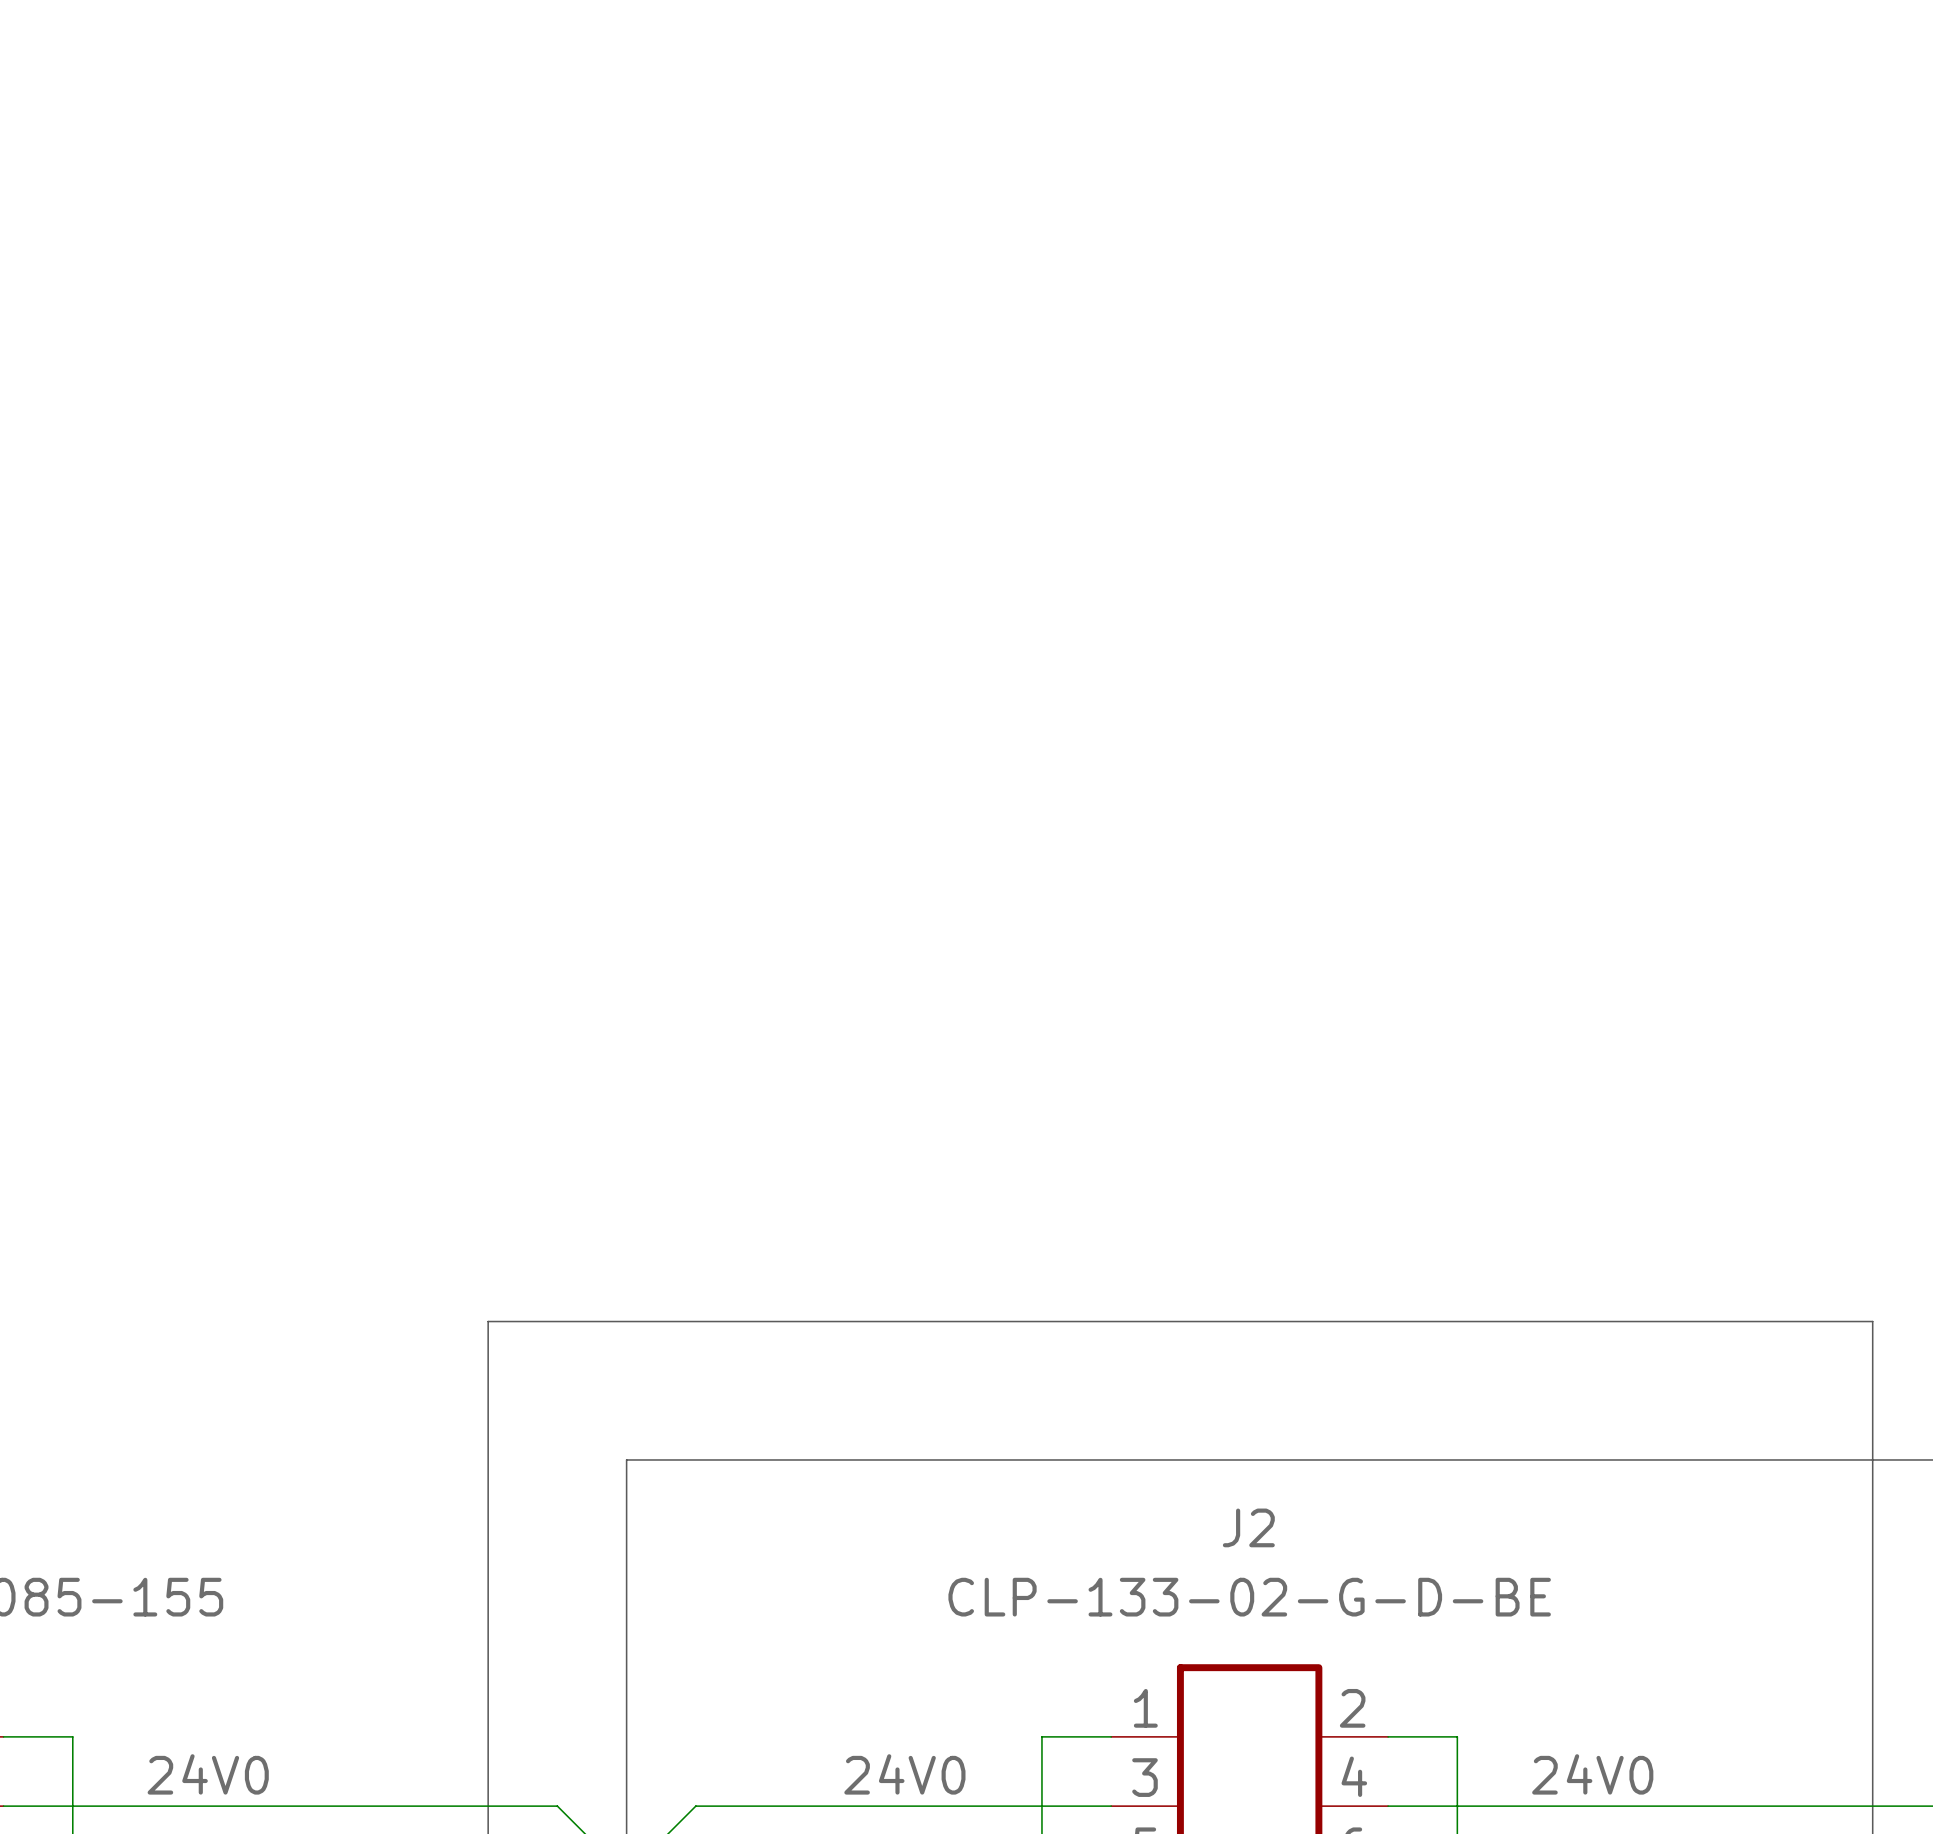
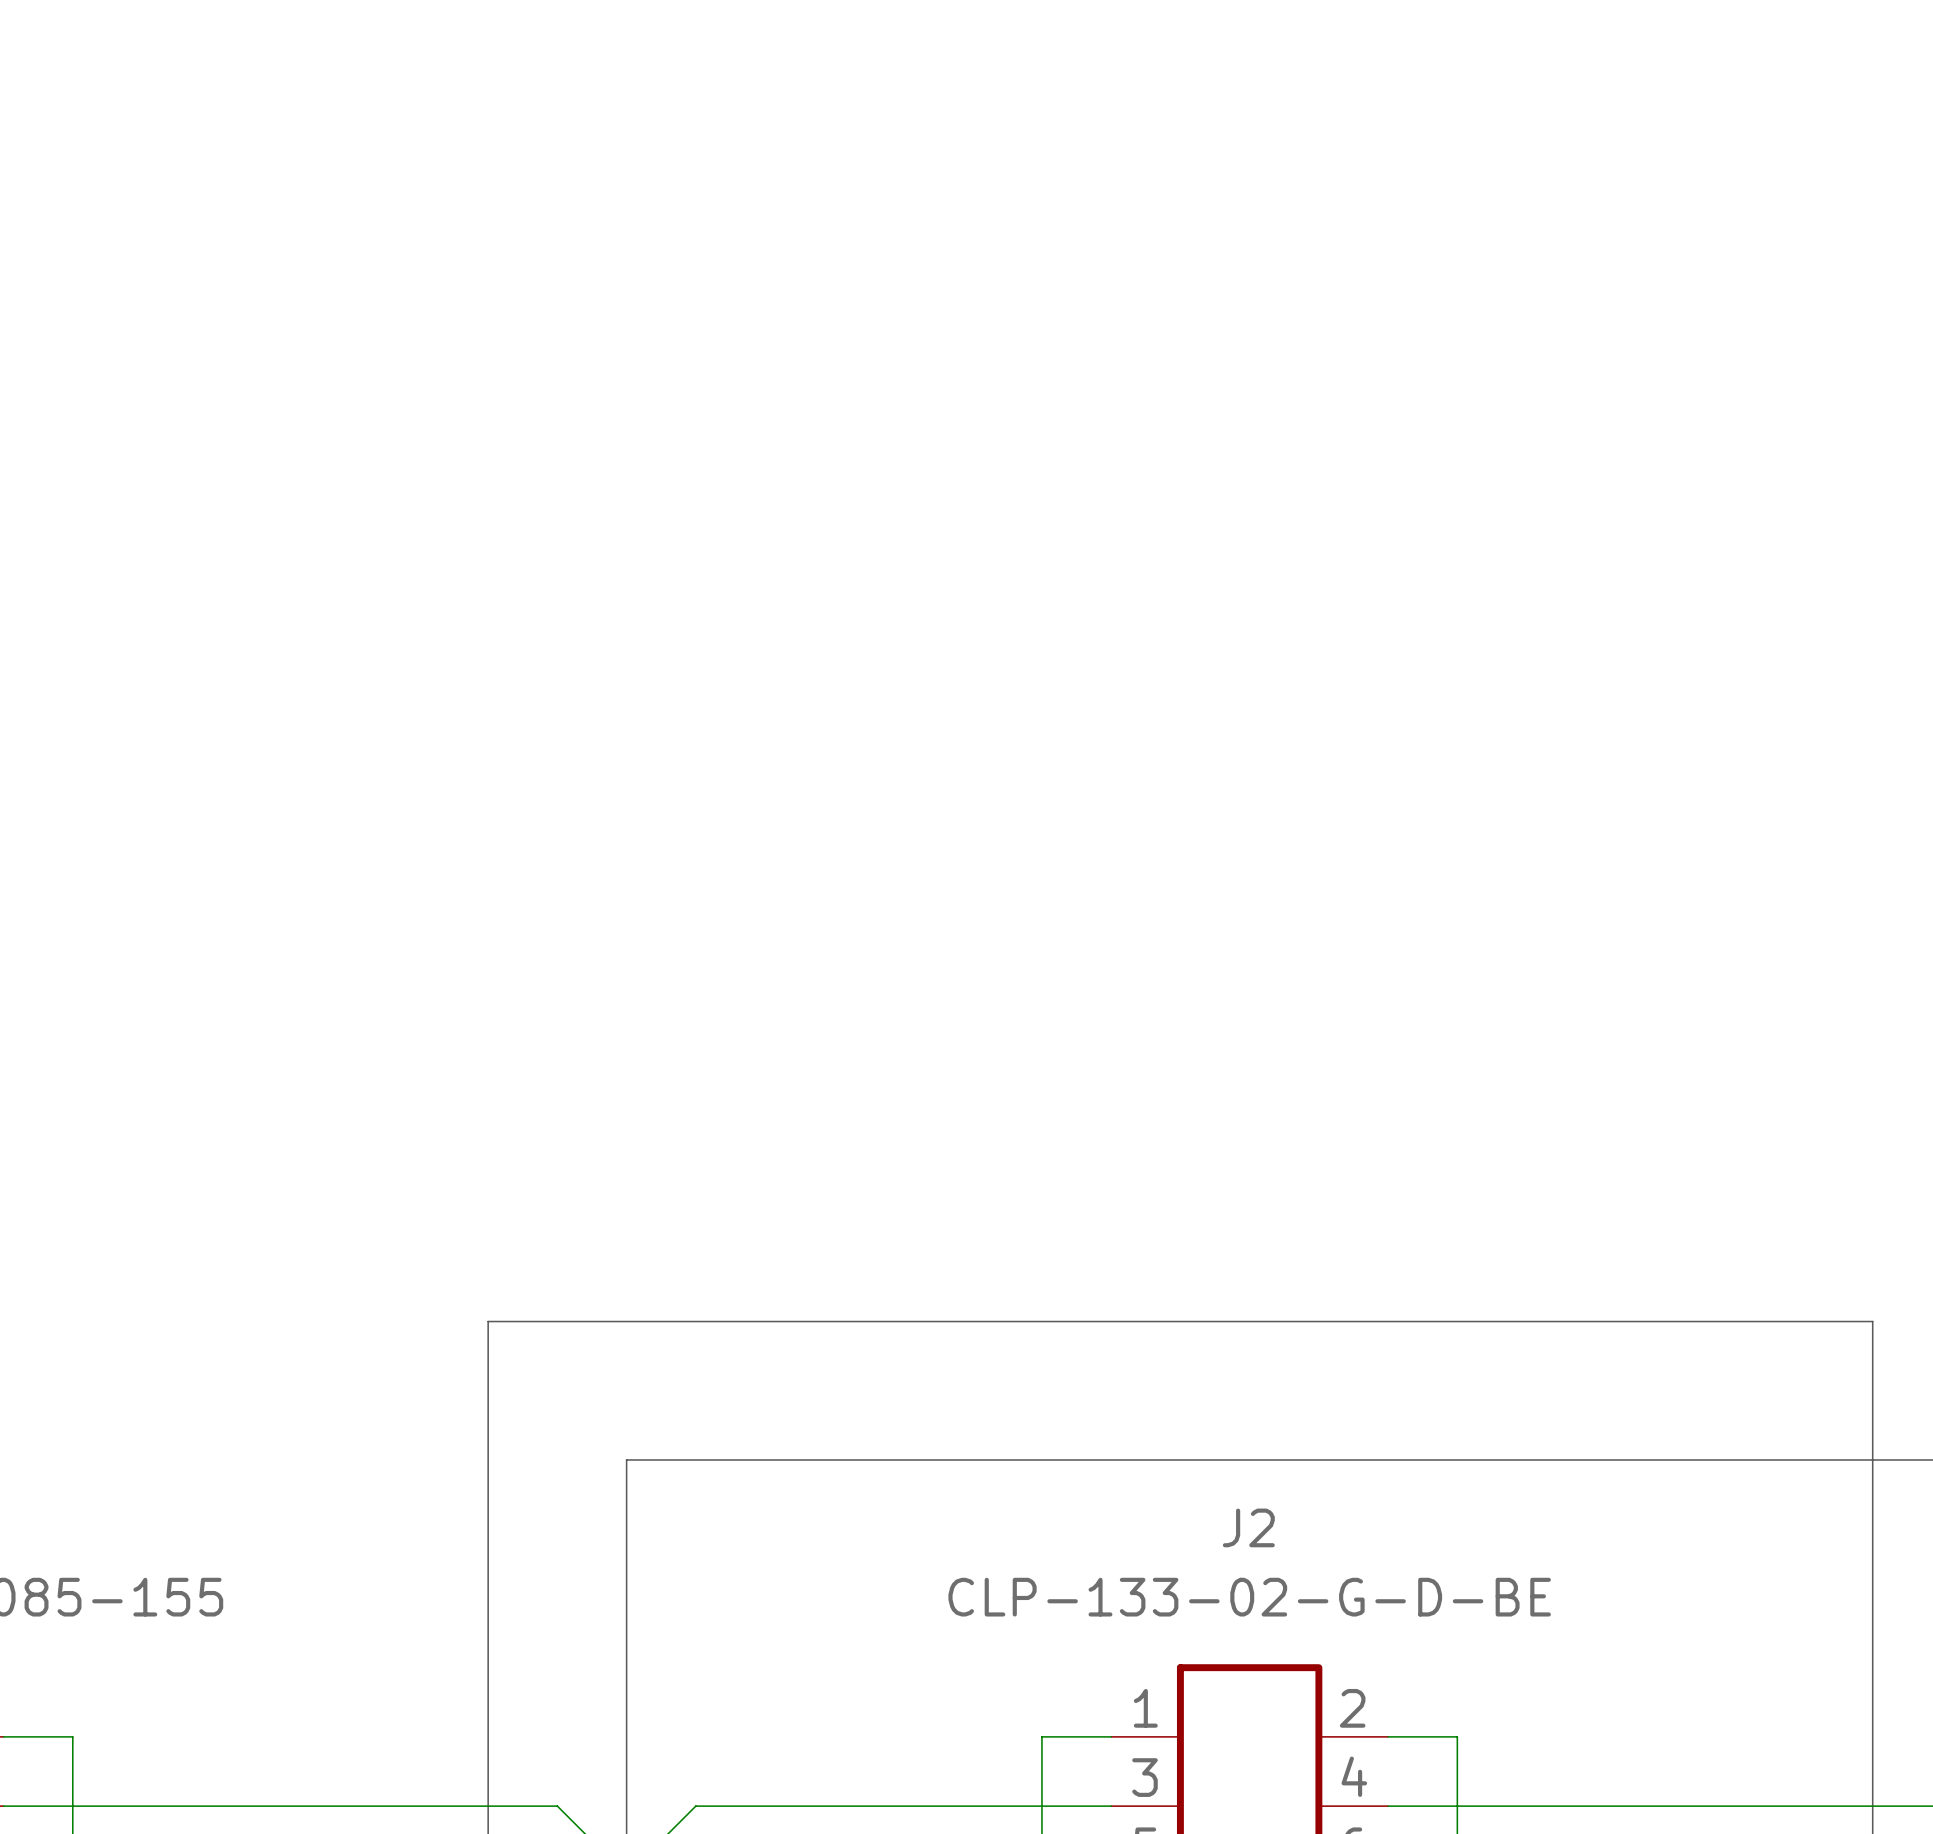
label: 24V0 (208, 1774) -> none
label: 24V0 (904, 1774) -> none
label: 24V0 (1592, 1774) -> none

